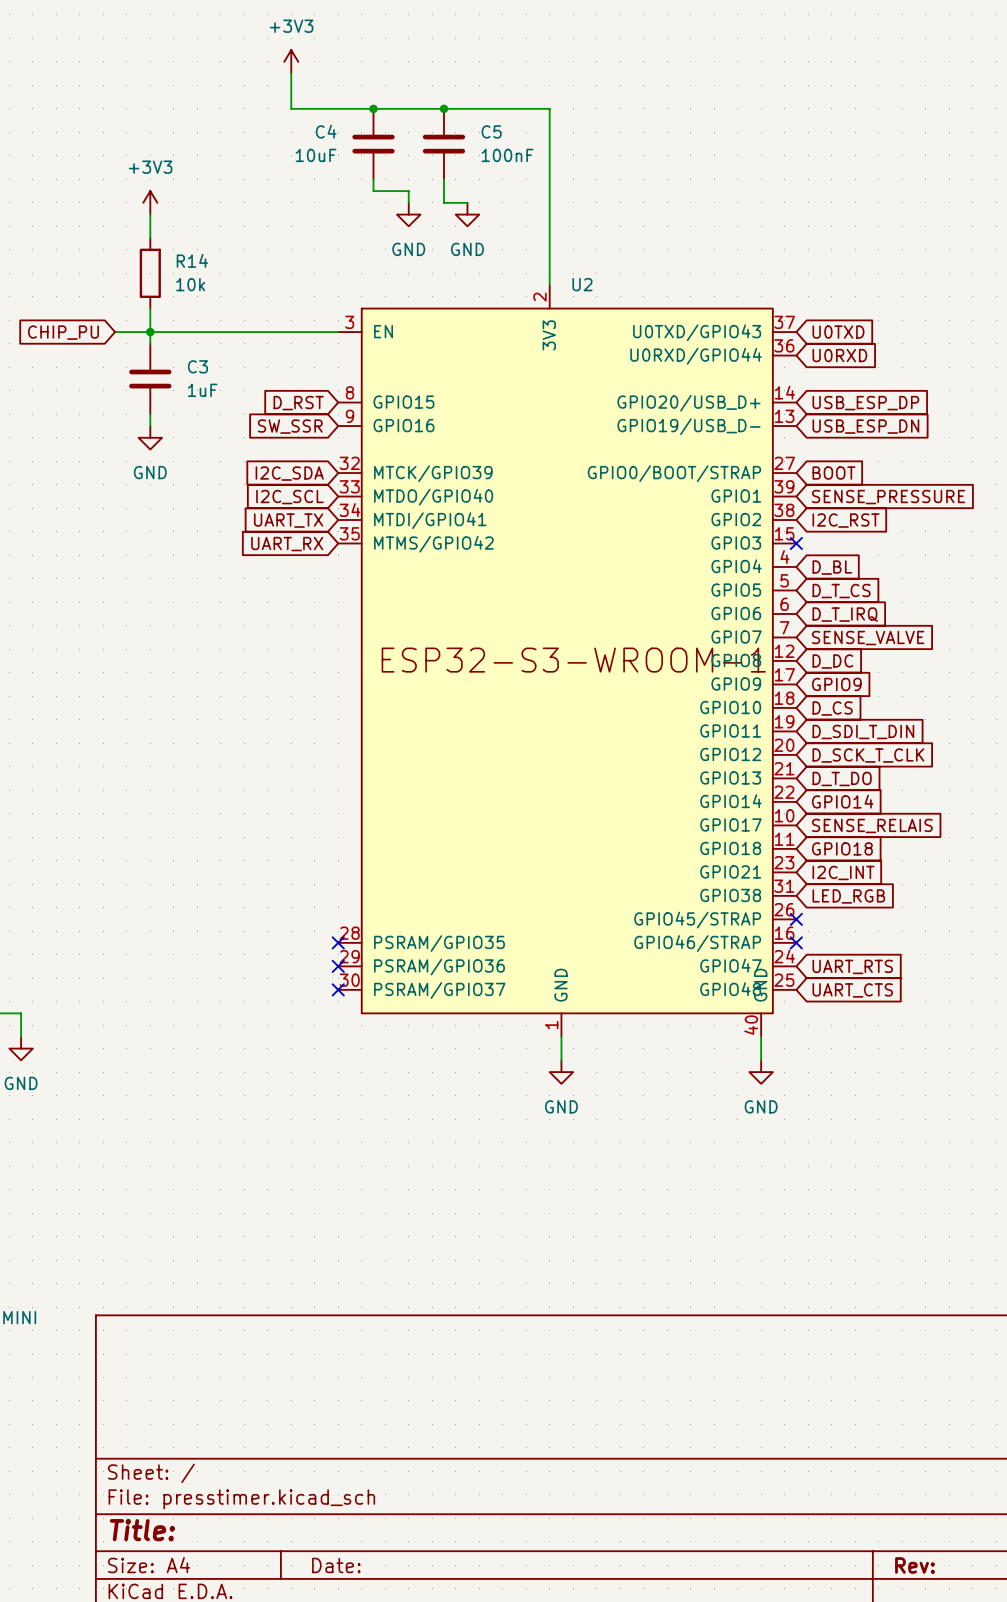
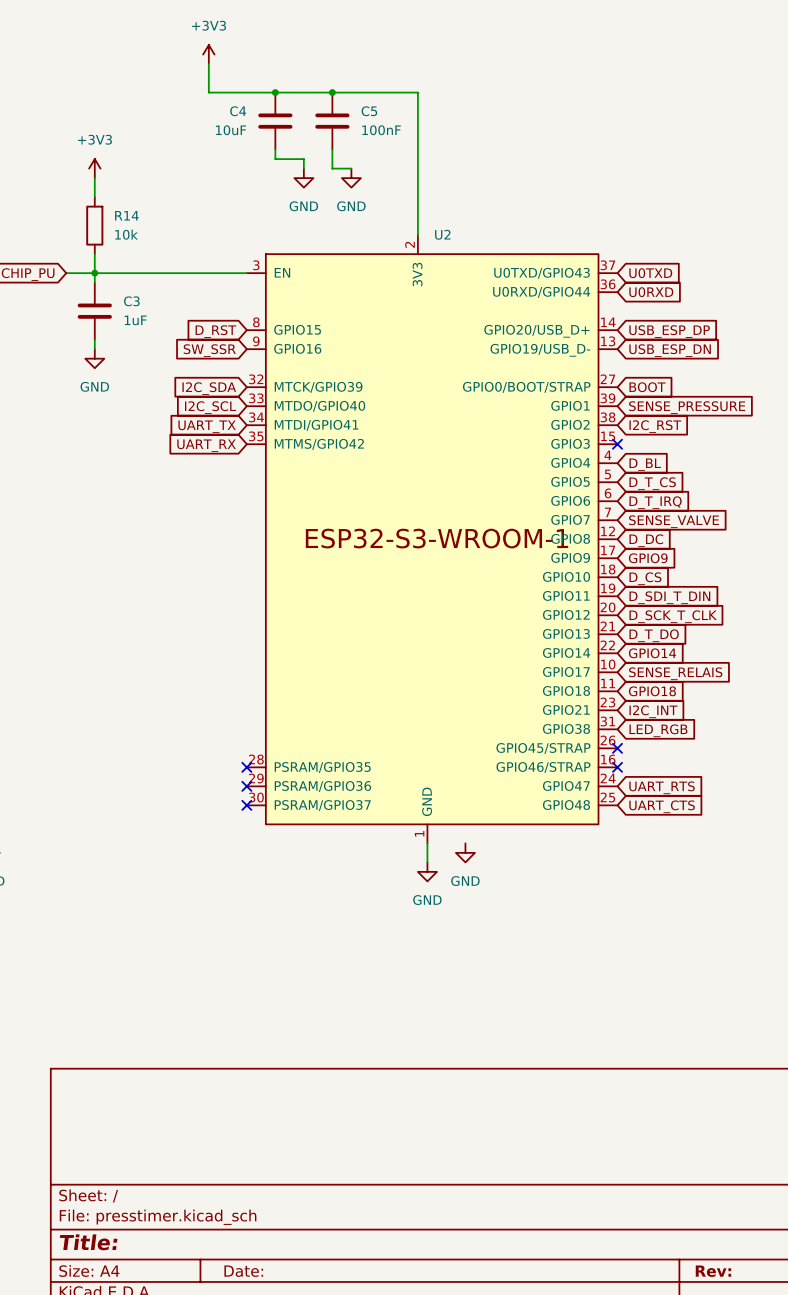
U2 symbol: [338, 285, 797, 1037] -> [246, 235, 618, 844]
wire: (761, 1036) (761, 1060) -> none
power symbol position: GND (761, 1072) -> GND (465, 852)

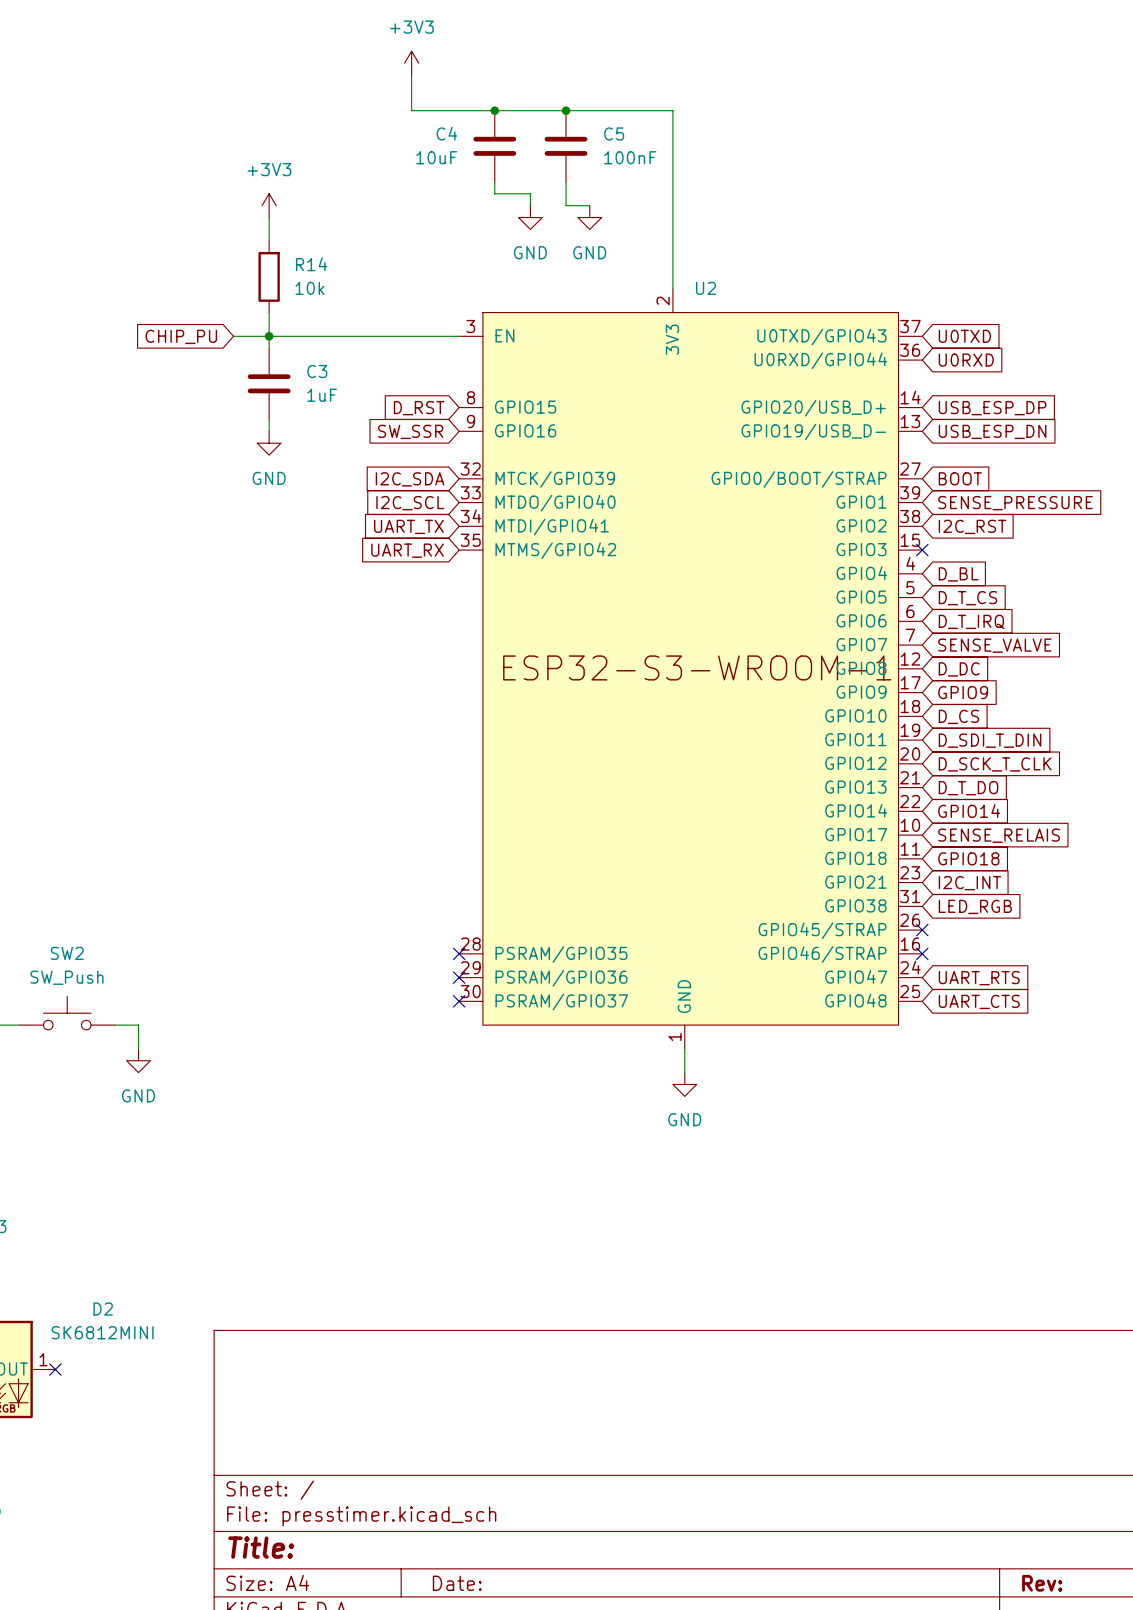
power symbol: GND (465, 852) -> none

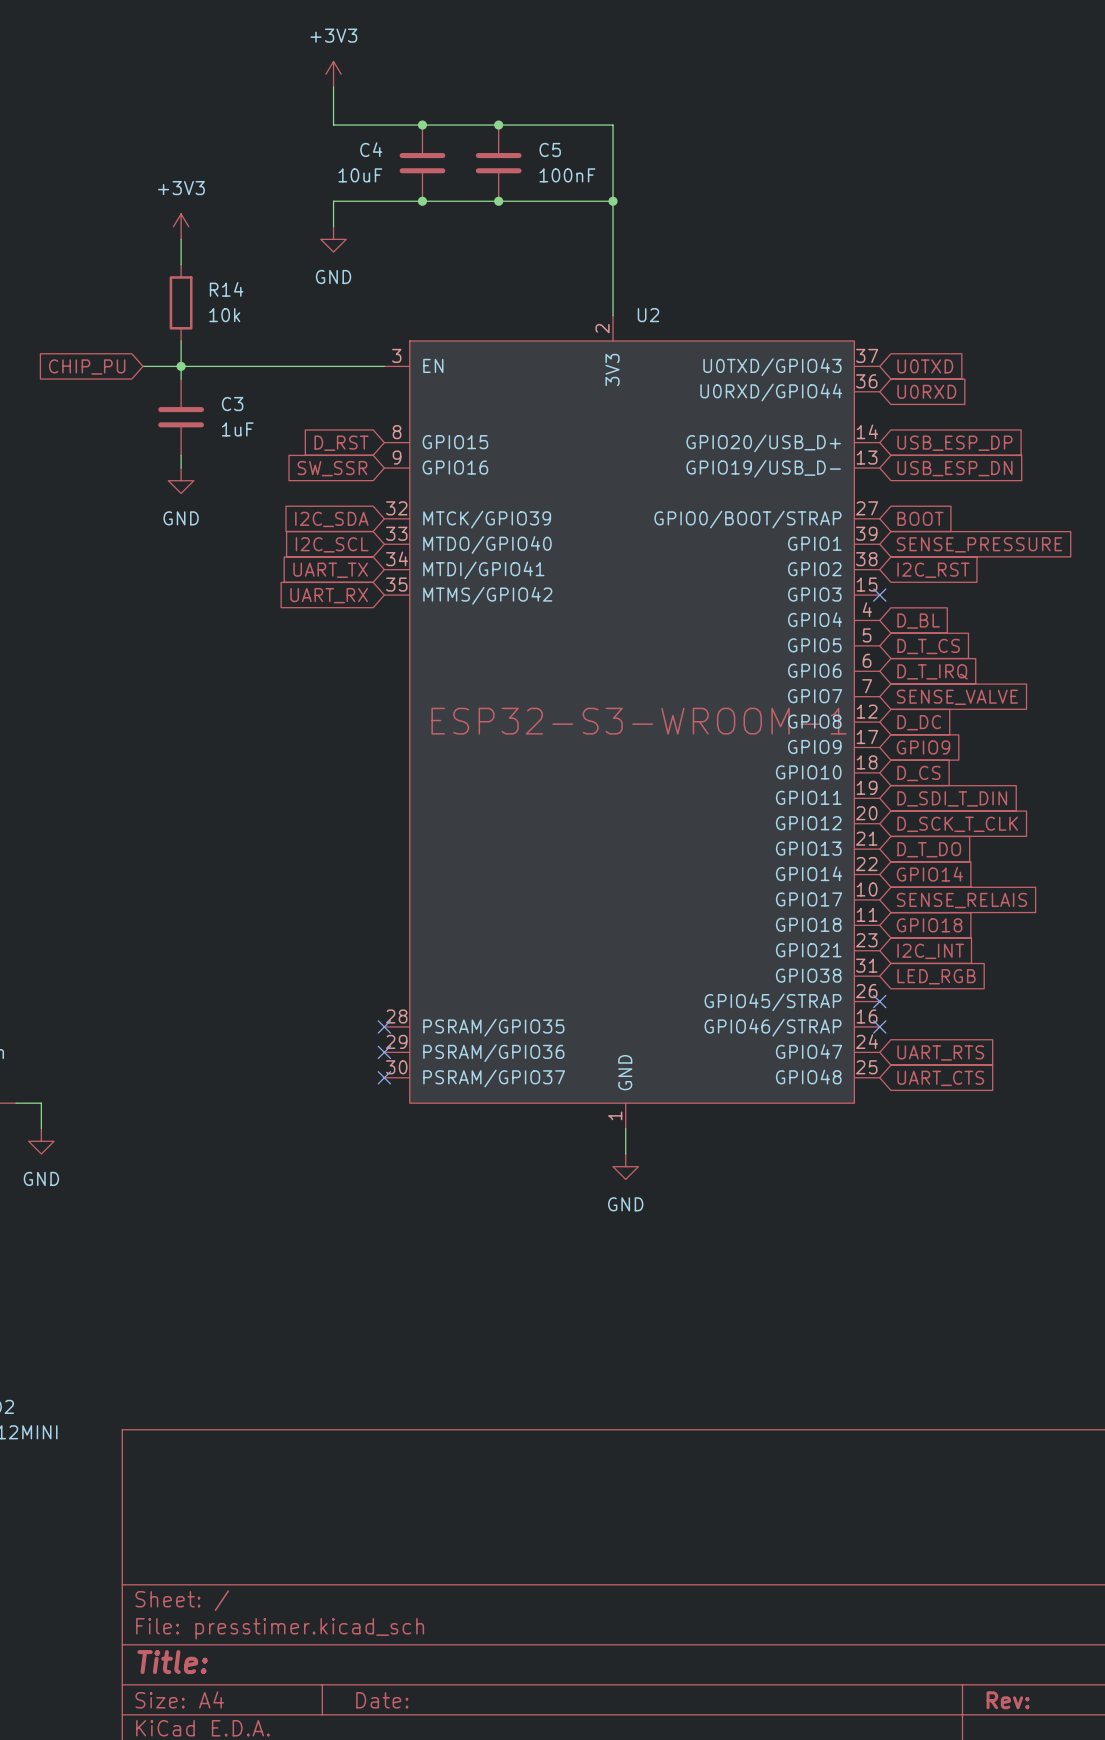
wire: (494, 181) (494, 193) (530, 193) (530, 205) -> none
junction: none -> (422, 201)
wire: (566, 181) (566, 205) (589, 205) -> none
junction: none -> (498, 201)
wire: none -> (613, 201) (333, 201) (333, 226)
junction: none -> (613, 201)
power symbol: none -> GND (333, 239)
power symbol: GND (530, 217) -> none
power symbol: GND (589, 217) -> none

